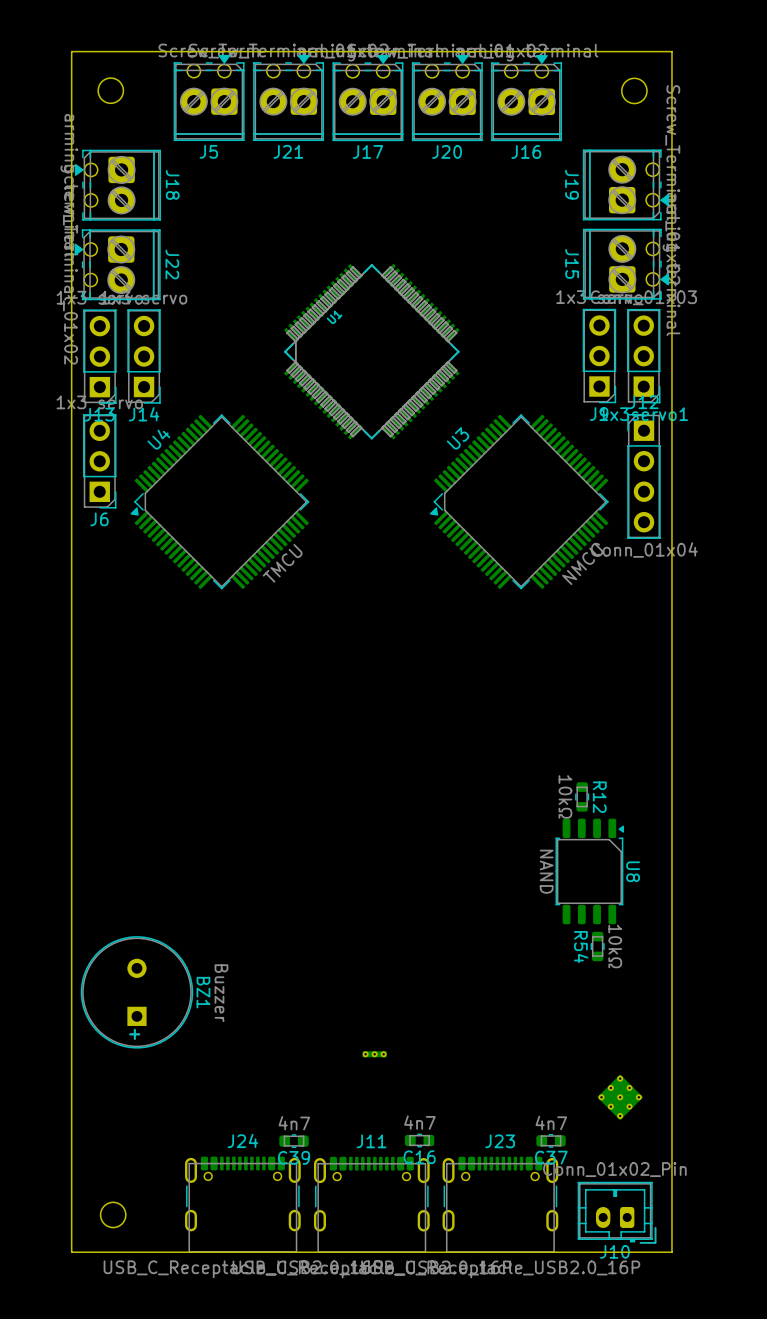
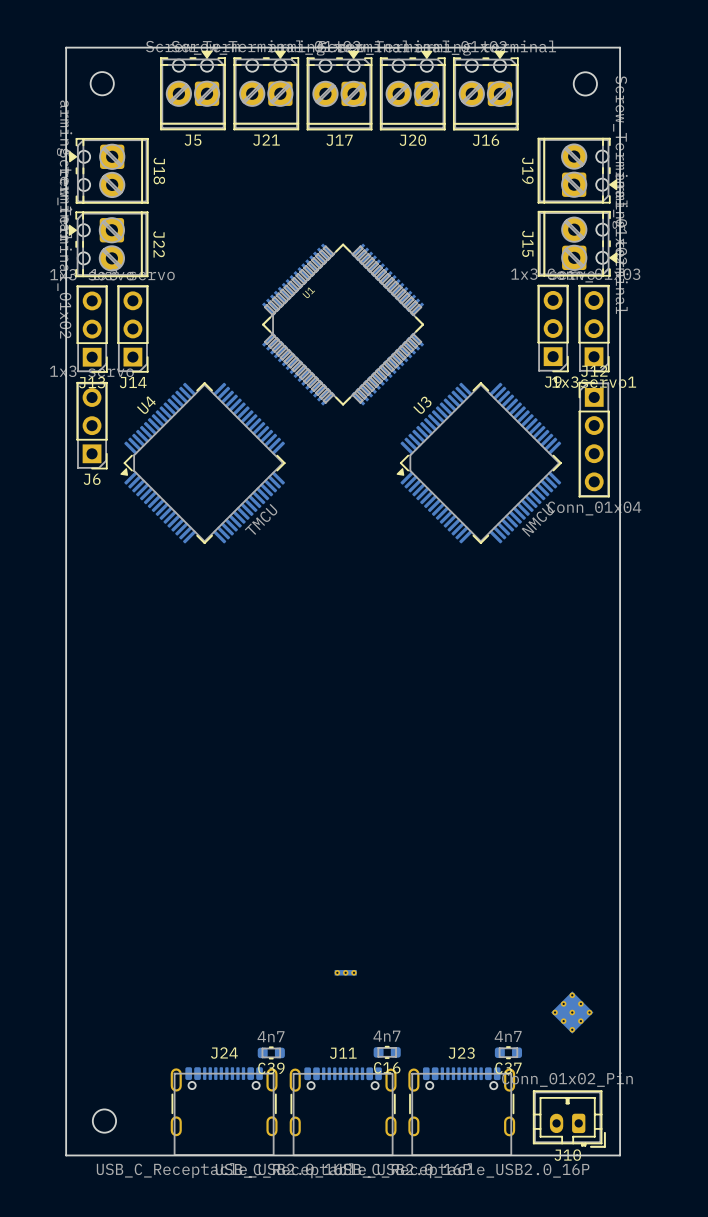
R12: 10kΩ (582, 796) -> none
U8: NAND (589, 871) -> none
R54: 10kΩ (597, 946) -> none
BZ1: Buzzer (136, 992) -> none

